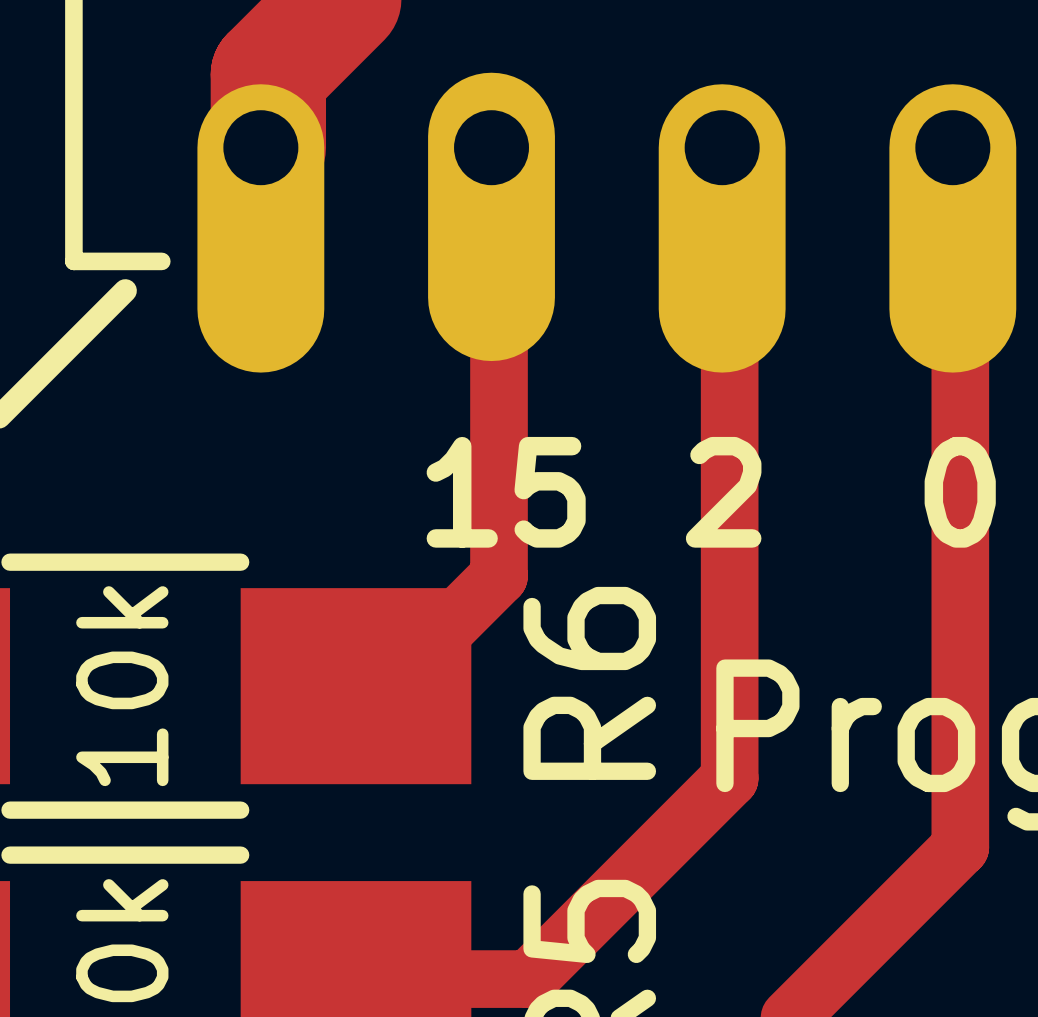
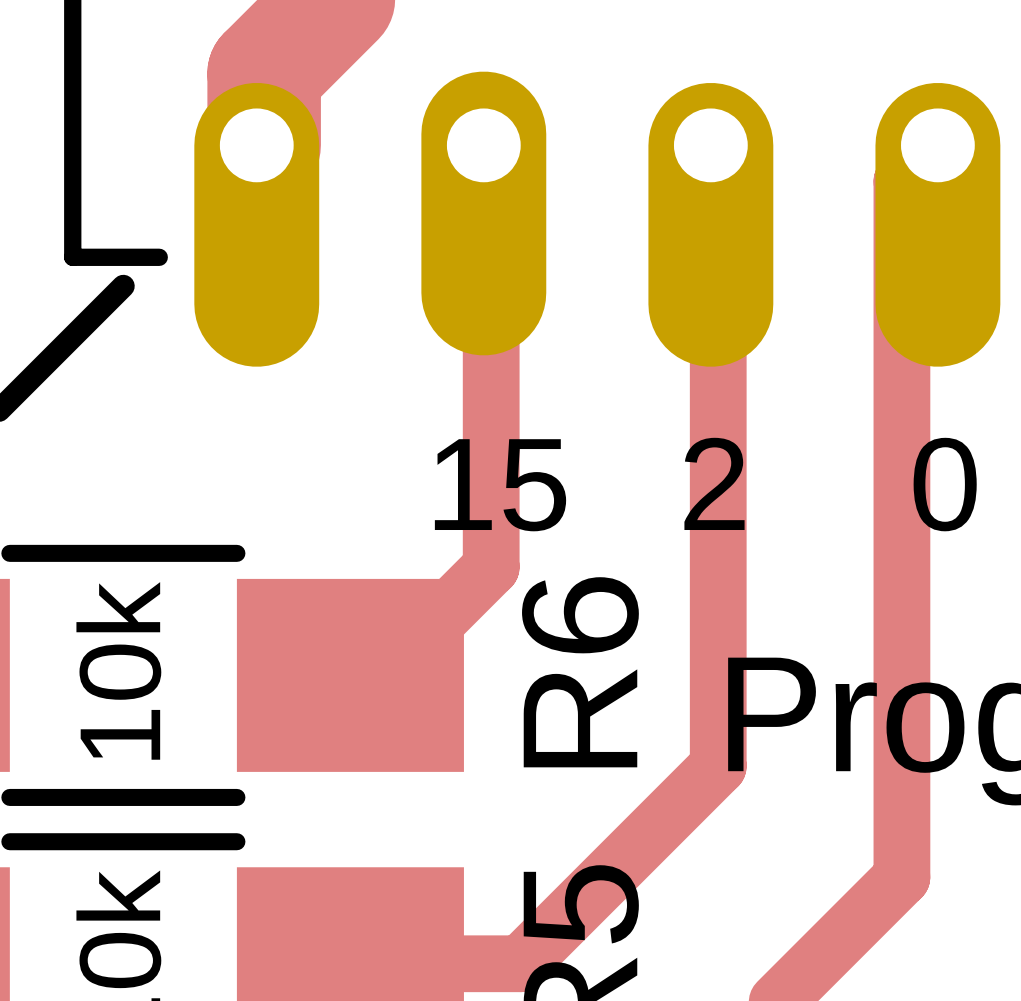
track: (960, 147) (960, 847) (916, 891) -> (937, 145) (901, 181) (901, 877)

